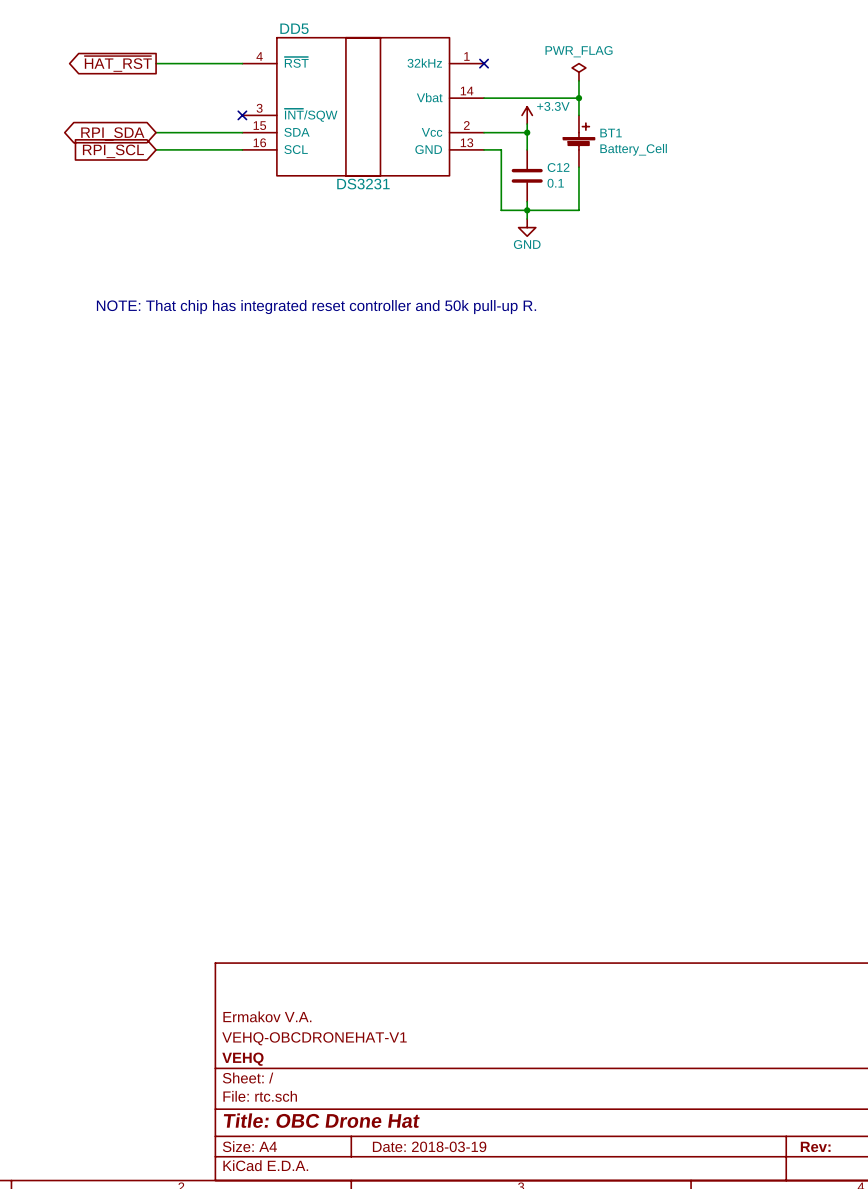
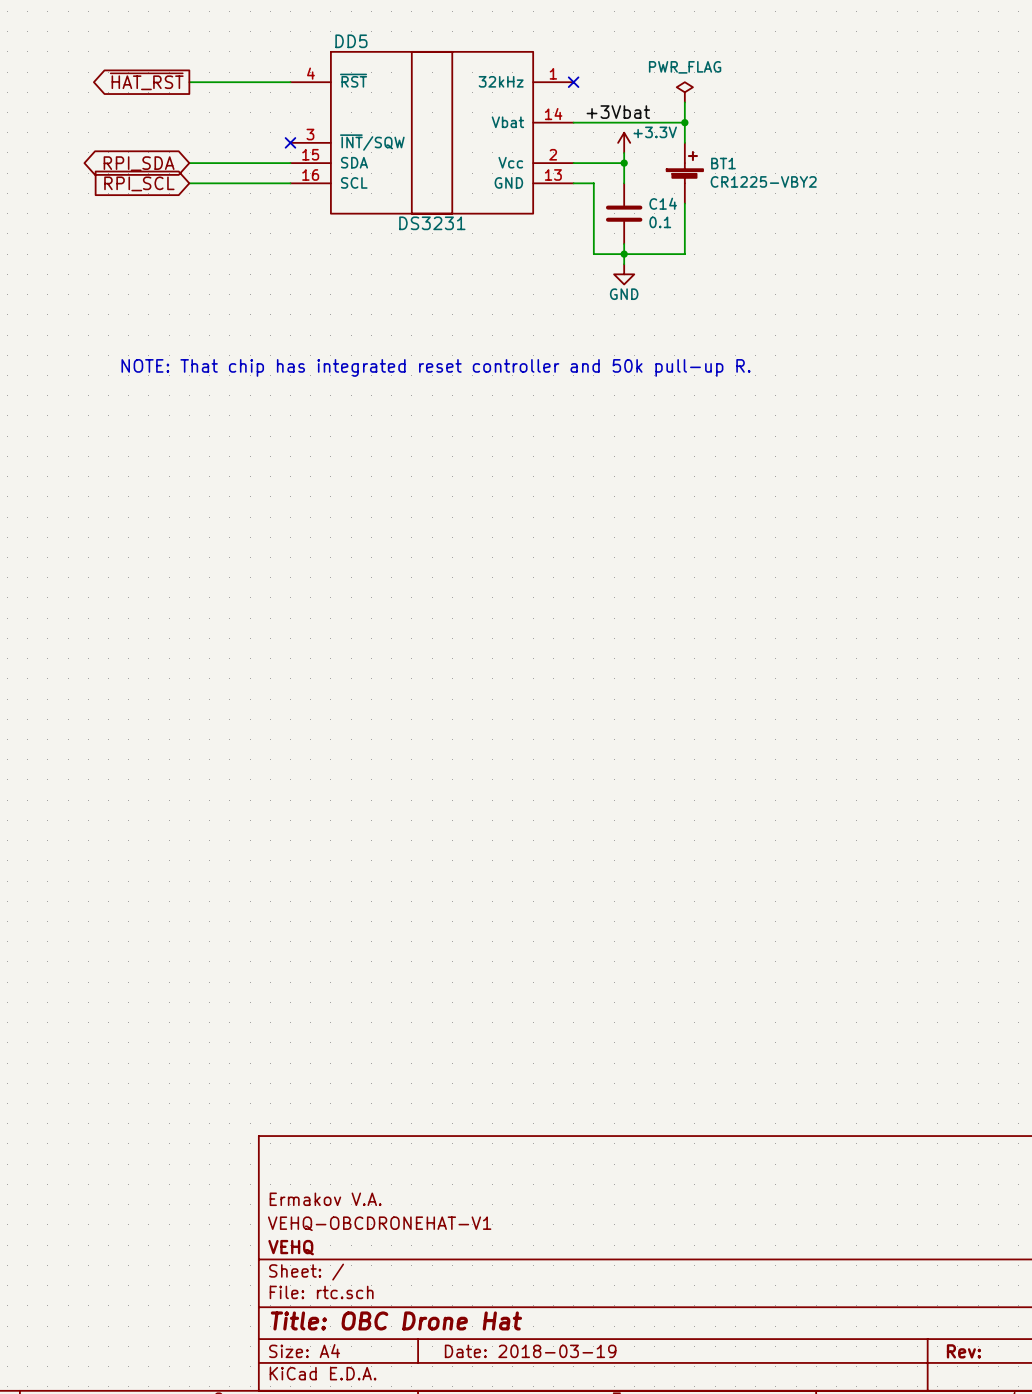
label: none -> +3Vbat (618, 112)
BT1 value: Battery_Cell (633, 149) -> CR1225-VBY2 (763, 181)
C12 name: C12 (558, 167) -> C14 (663, 203)

